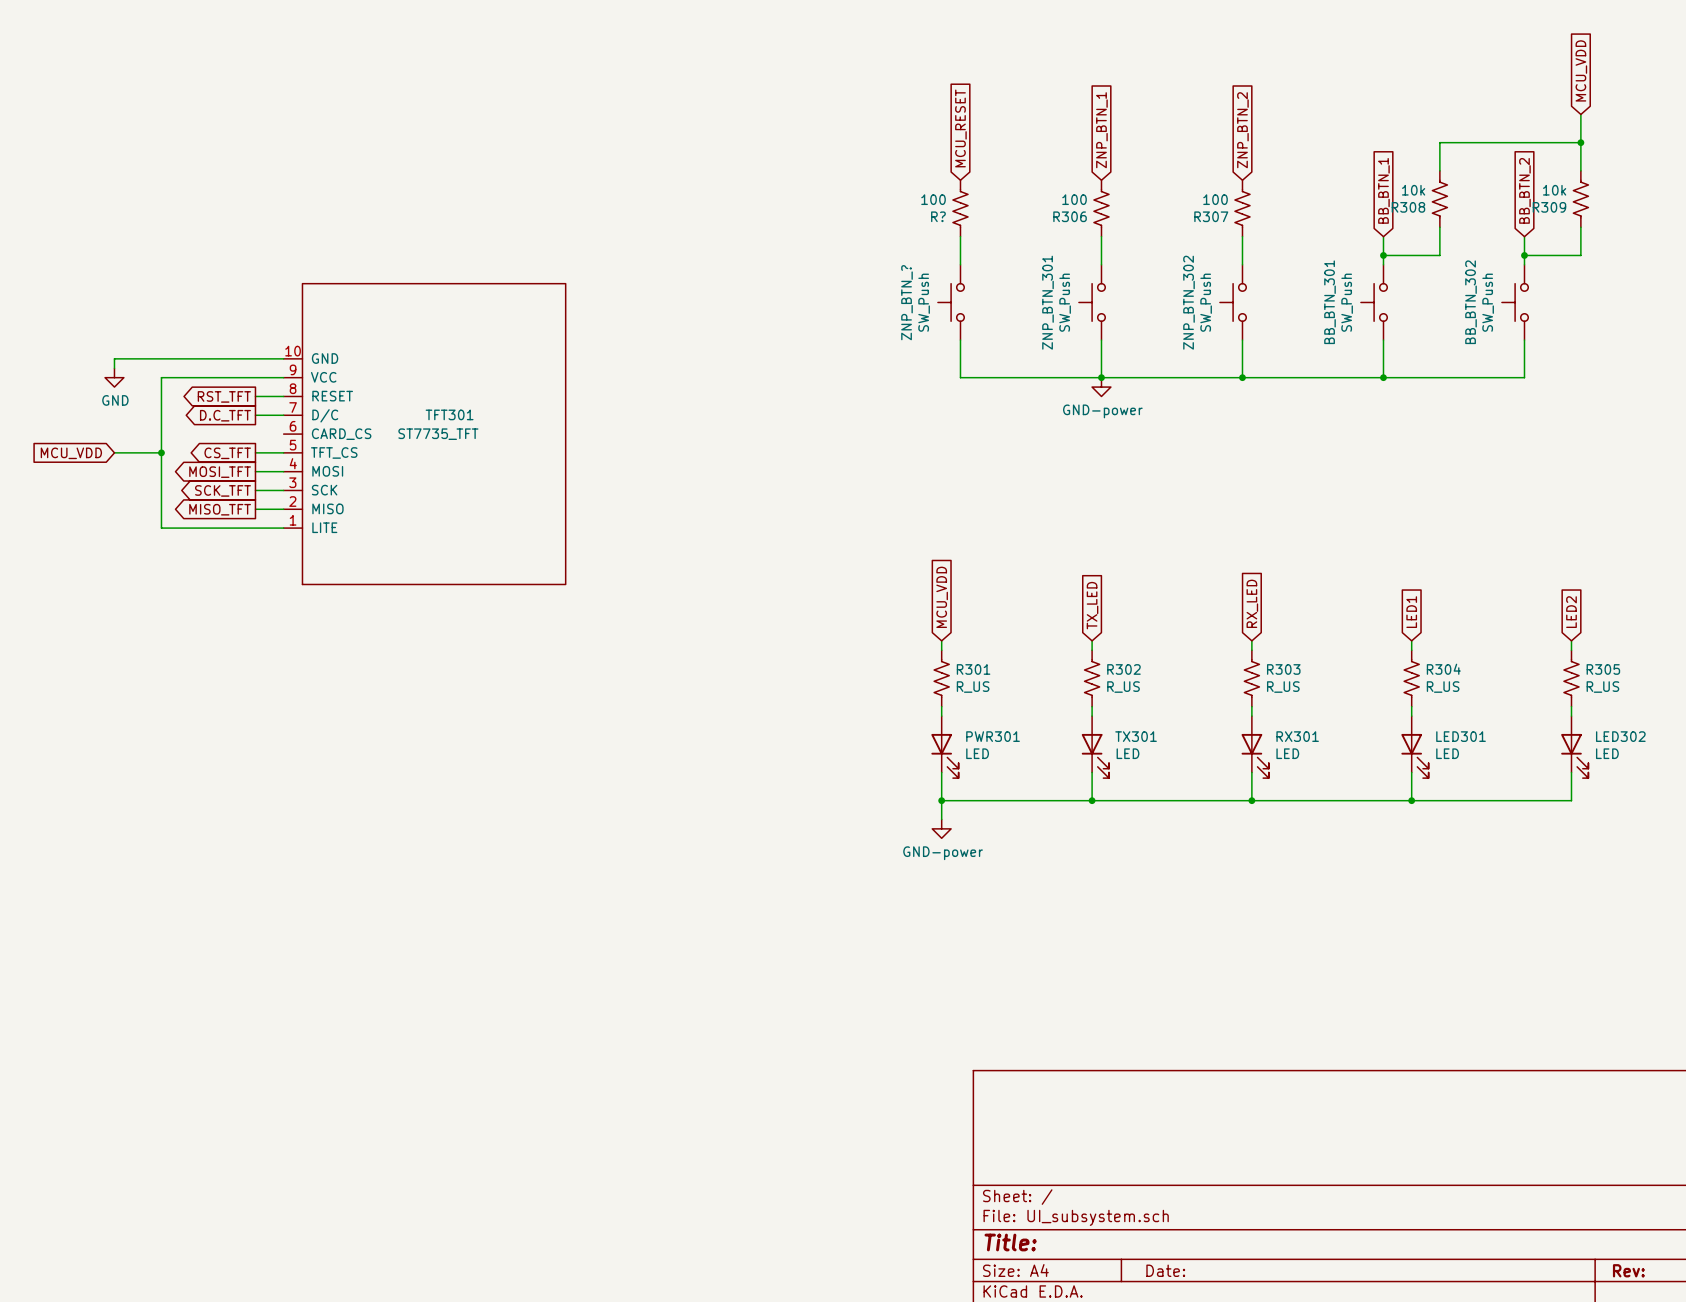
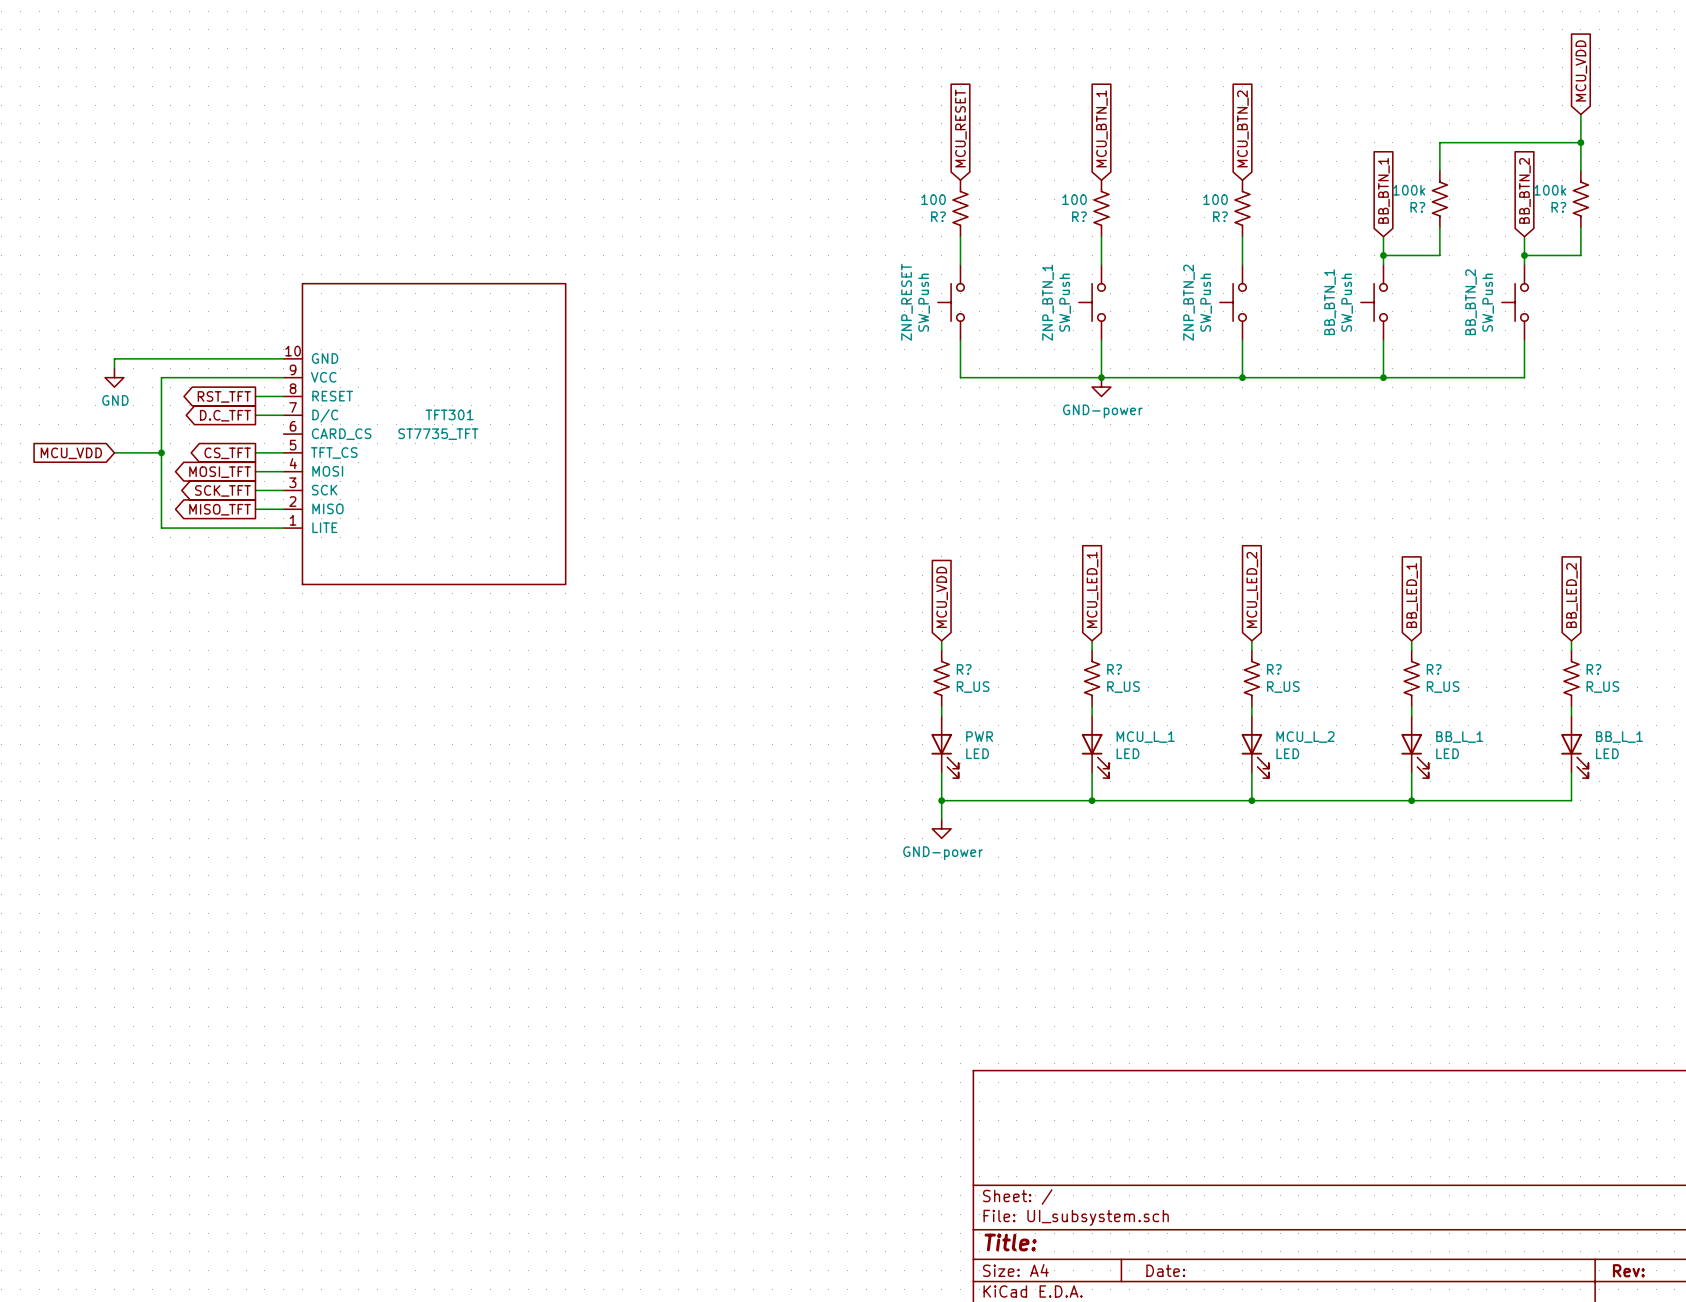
global label: ZNP_BTN_1 (1101, 130) -> MCU_BTN_1 (1101, 128)
global label: ZNP_BTN_2 (1242, 130) -> MCU_BTN_2 (1242, 128)
R308 value: 10k (1413, 190) -> 100k (1409, 190)
R309 value: 10k (1554, 190) -> 100k (1550, 190)
R308 name: R308 (1408, 207) -> R? (1417, 207)
R309 name: R309 (1549, 207) -> R? (1558, 207)
R306 name: R306 (1070, 216) -> R? (1079, 216)
R307 name: R307 (1211, 216) -> R? (1220, 216)
ZNP_BTN_? name: ZNP_BTN_? (906, 302) -> ZNP_RESET (906, 302)
ZNP_BTN_301 name: ZNP_BTN_301 (1048, 302) -> ZNP_BTN_1 (1048, 302)
ZNP_BTN_302 name: ZNP_BTN_302 (1189, 302) -> ZNP_BTN_2 (1189, 302)
BB_BTN_301 name: BB_BTN_301 (1330, 302) -> BB_BTN_1 (1330, 302)
BB_BTN_302 name: BB_BTN_302 (1471, 302) -> BB_BTN_2 (1471, 302)
global label: RX_LED (1252, 603) -> MCU_LED_2 (1252, 589)
global label: TX_LED (1092, 605) -> MCU_LED_1 (1092, 589)
global label: LED1 (1411, 612) -> BB_LED_1 (1412, 595)
global label: LED2 (1571, 612) -> BB_LED_2 (1571, 595)
R301 name: R301 (973, 669) -> R? (964, 669)
R302 name: R302 (1123, 669) -> R? (1114, 669)
R303 name: R303 (1283, 669) -> R? (1274, 669)
R304 name: R304 (1443, 669) -> R? (1434, 669)
R305 name: R305 (1603, 669) -> R? (1593, 669)
PWR301 name: PWR301 (993, 736) -> PWR (979, 736)
TX301 name: TX301 (1136, 736) -> MCU_L_1 (1145, 737)
RX301 name: RX301 (1297, 736) -> MCU_L_2 (1305, 737)
LED301 name: LED301 (1461, 736) -> BB_L_1 (1459, 737)
LED302 name: LED302 (1620, 736) -> BB_L_1 (1619, 737)

